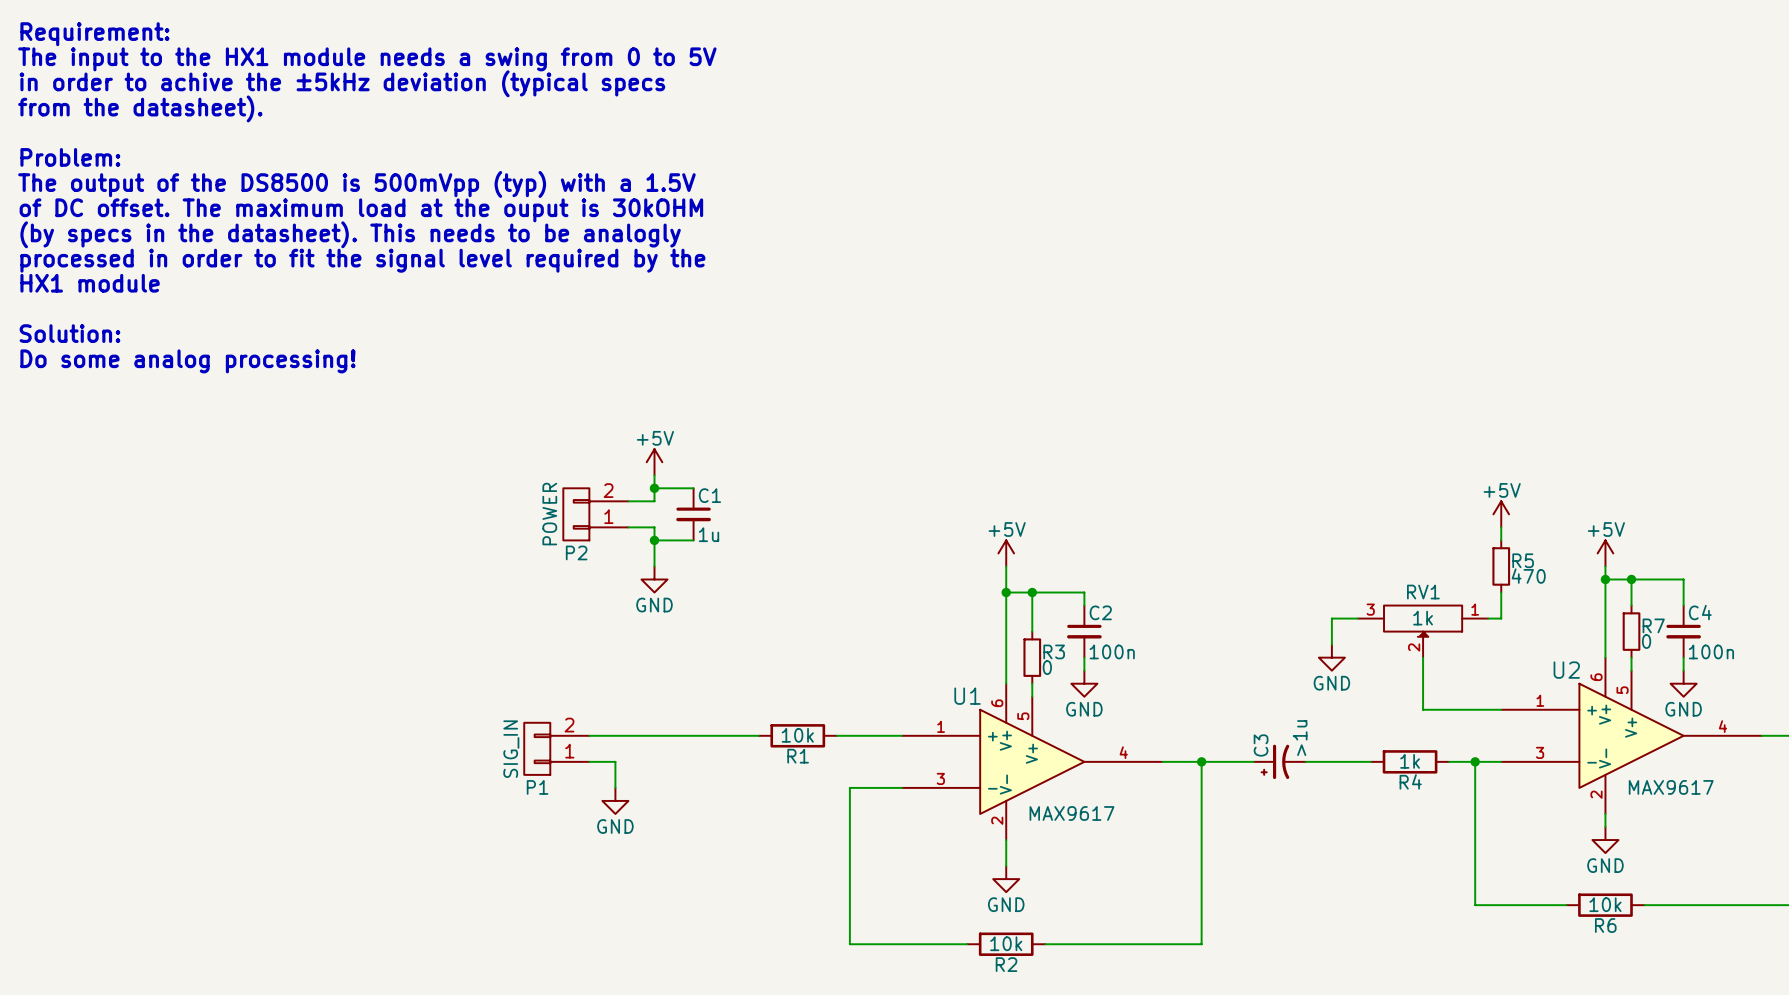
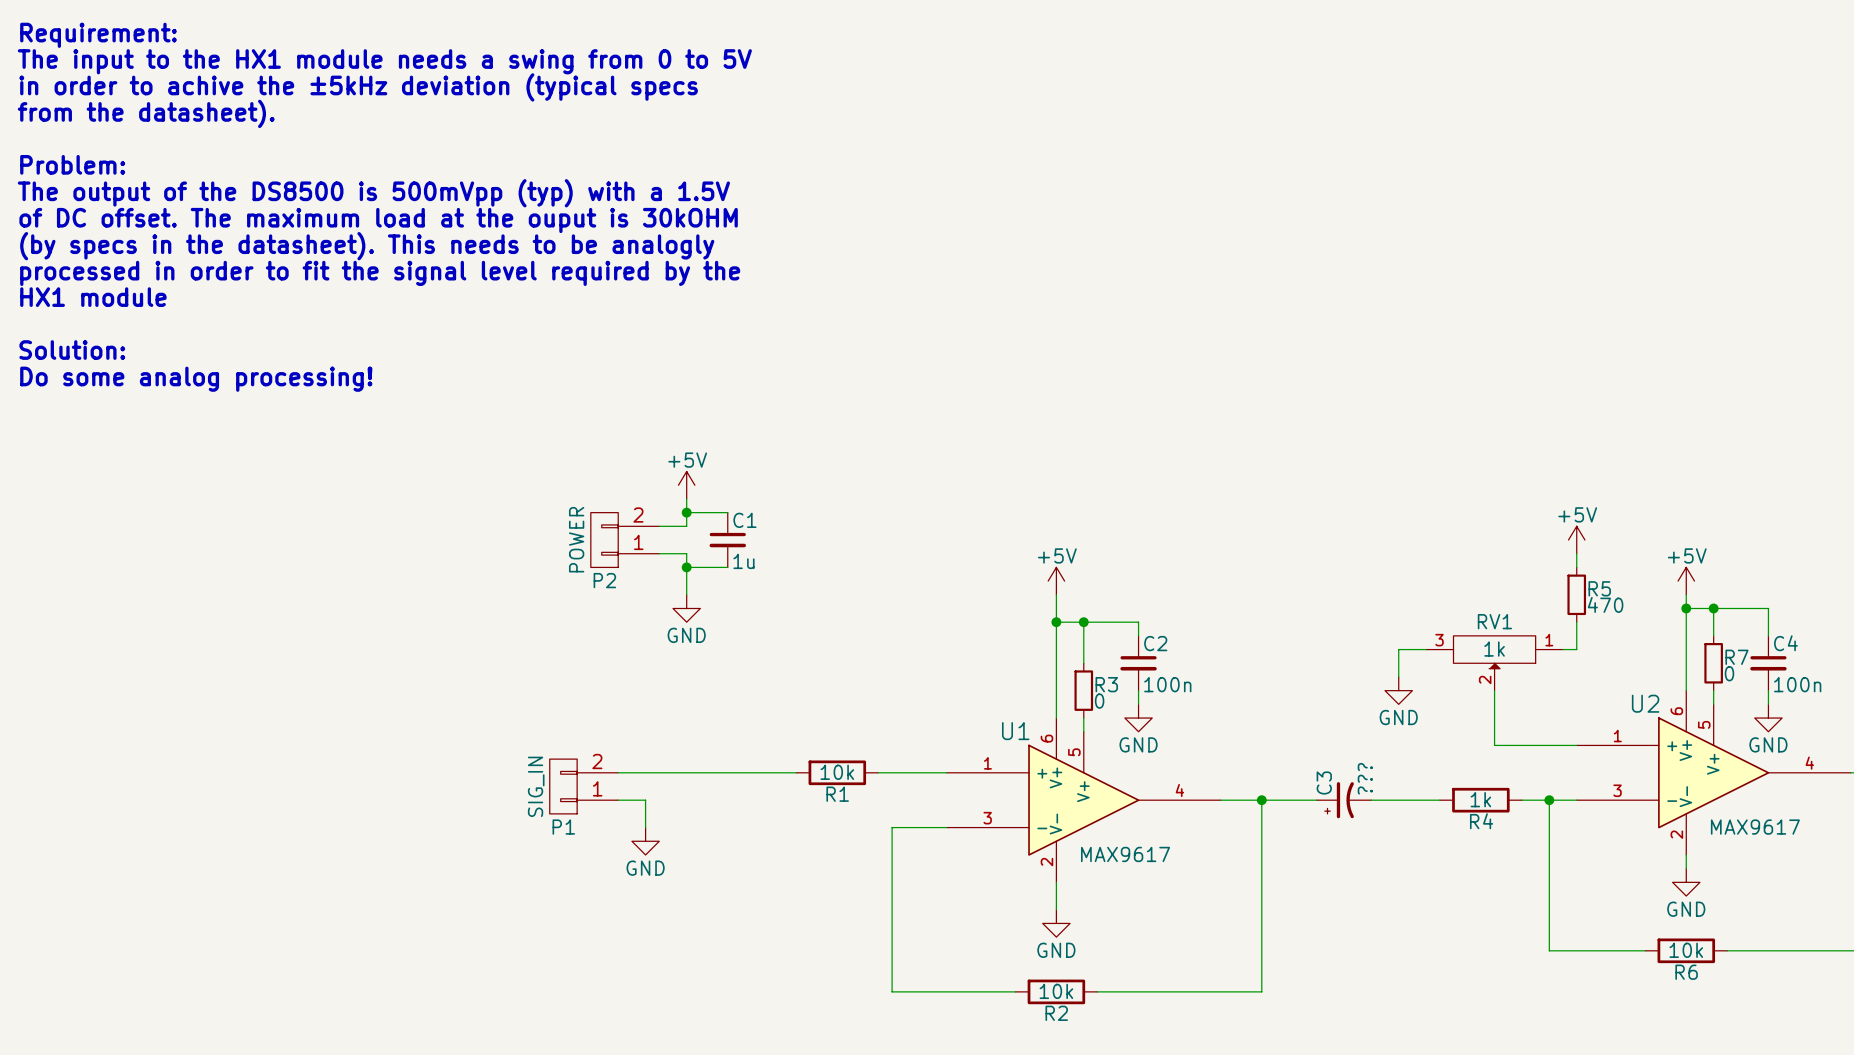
C3 value: >1u (1300, 738) -> ??? (1365, 778)

